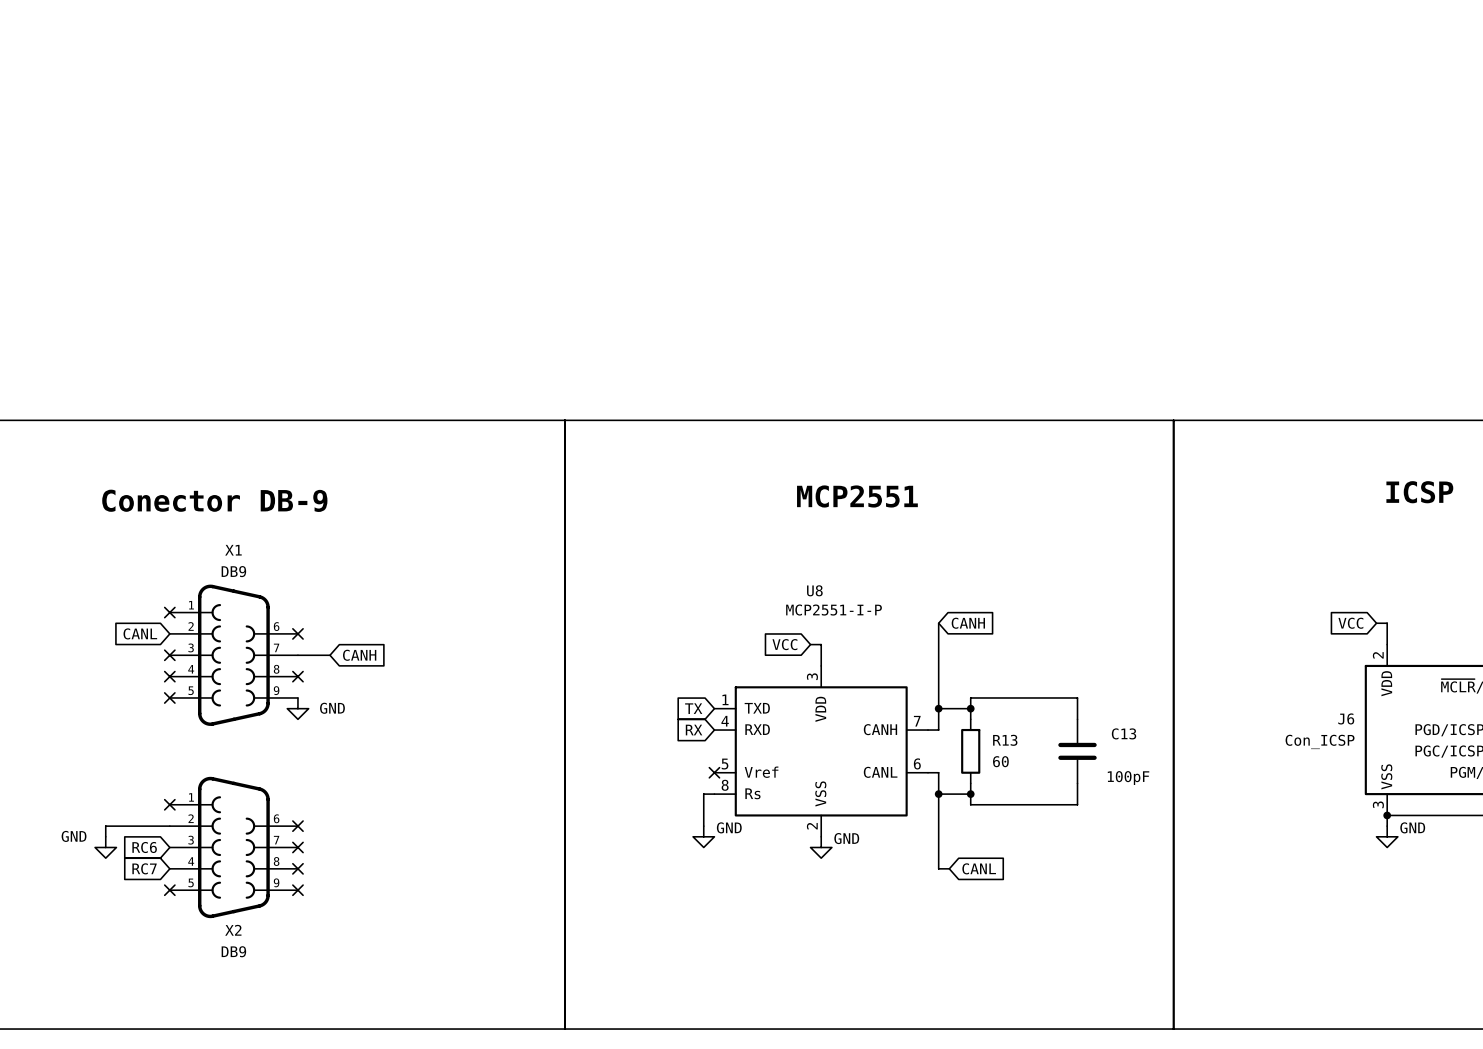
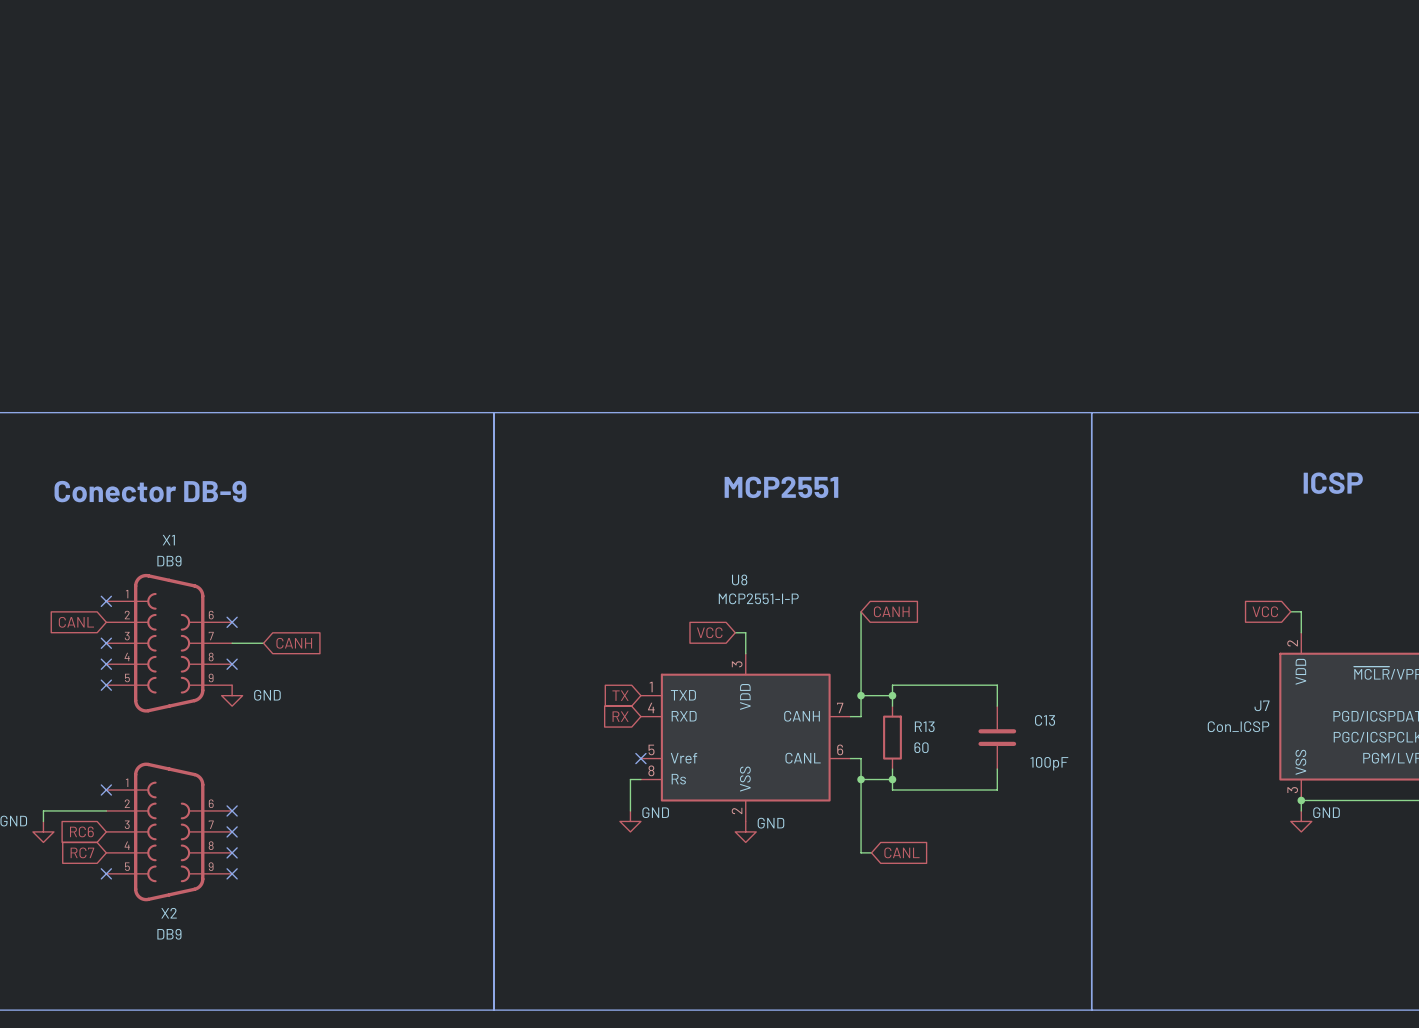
J6 name: J6 (1346, 718) -> J7 (1262, 705)

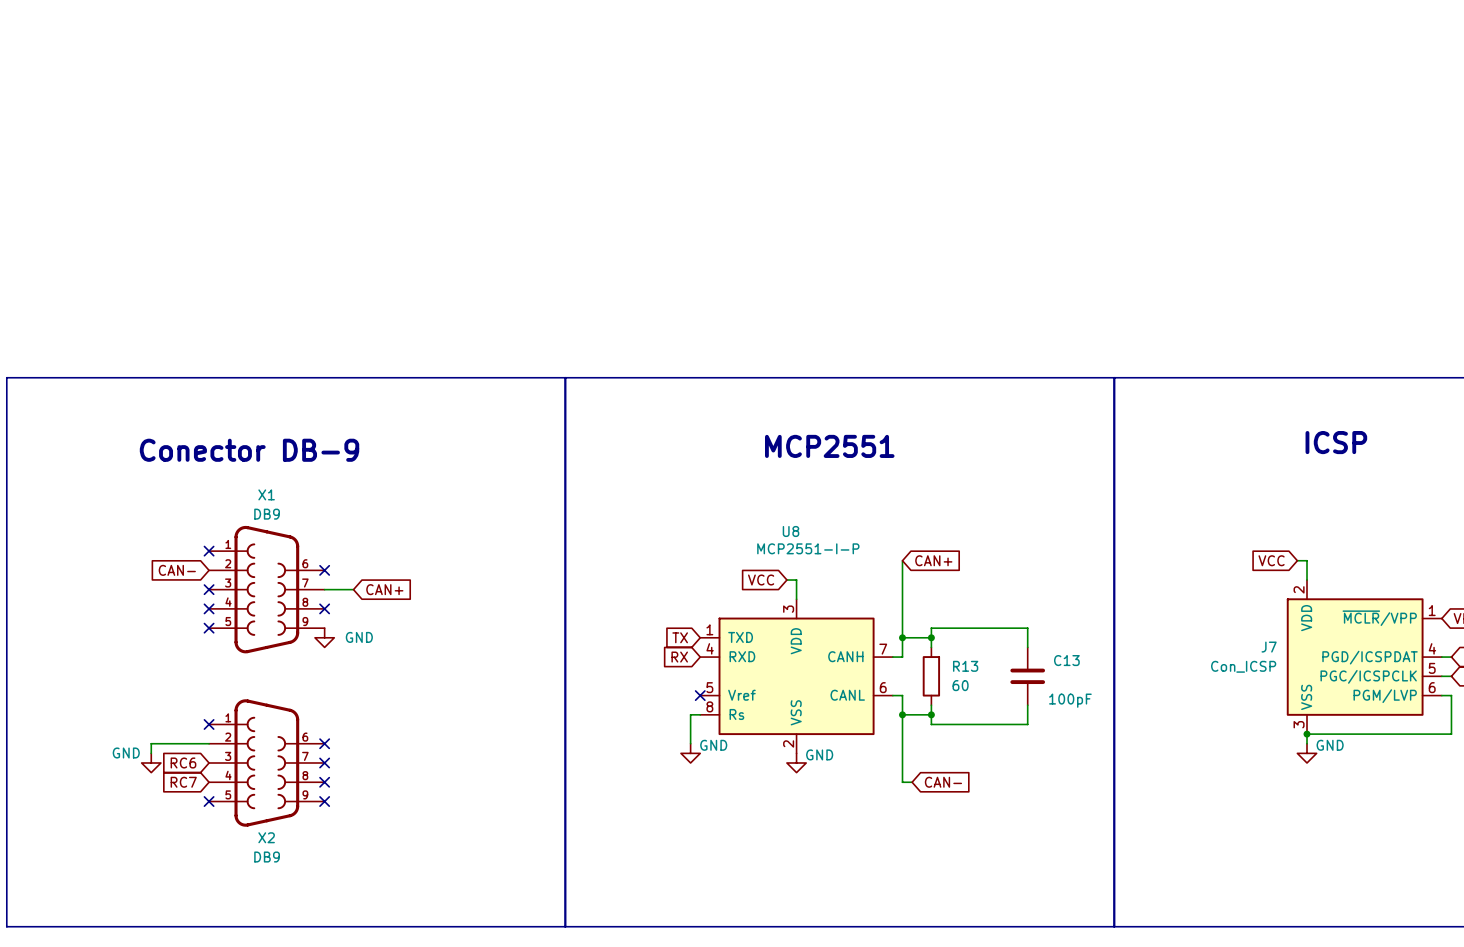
global label: CANH (891, 611) -> CAN+ (933, 560)
global label: CANL (76, 622) -> CAN- (177, 570)
global label: CANH (294, 643) -> CAN+ (384, 589)
global label: CANL (901, 852) -> CAN- (943, 782)

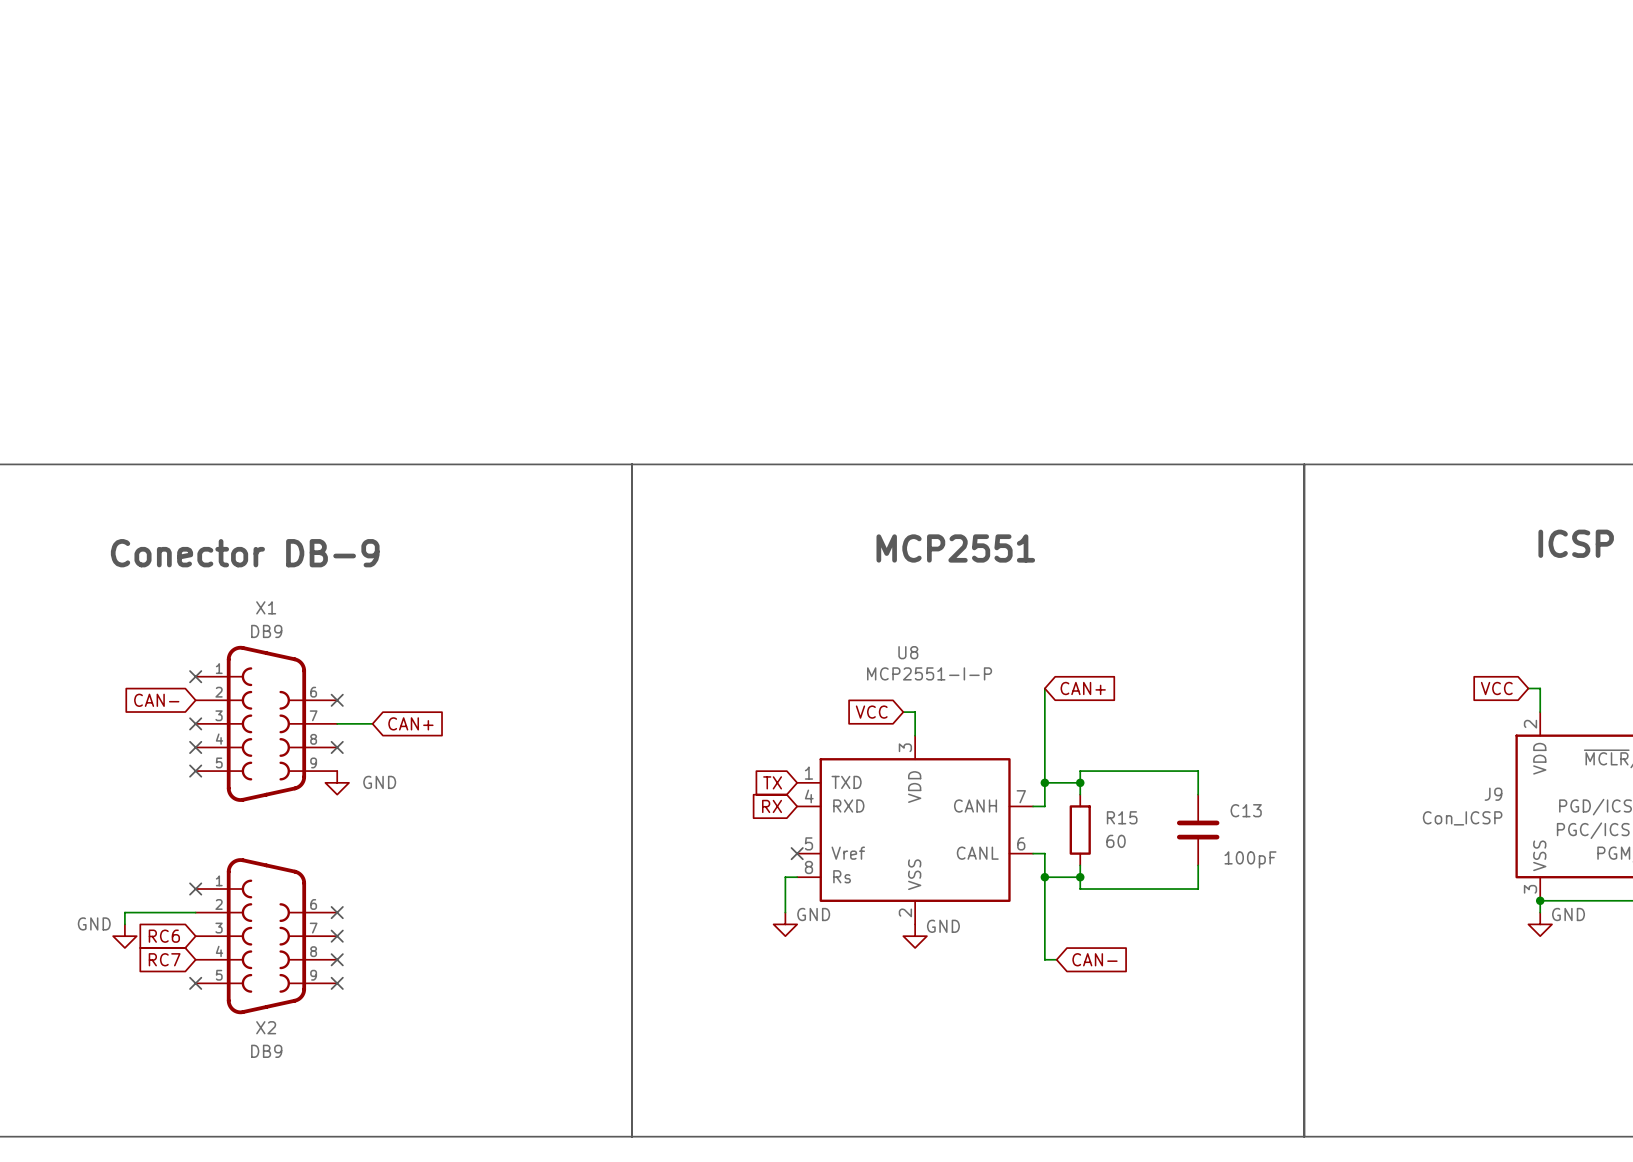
J7 name: J7 (1269, 647) -> J9 (1493, 794)
R13 name: R13 (965, 666) -> R15 (1122, 817)

